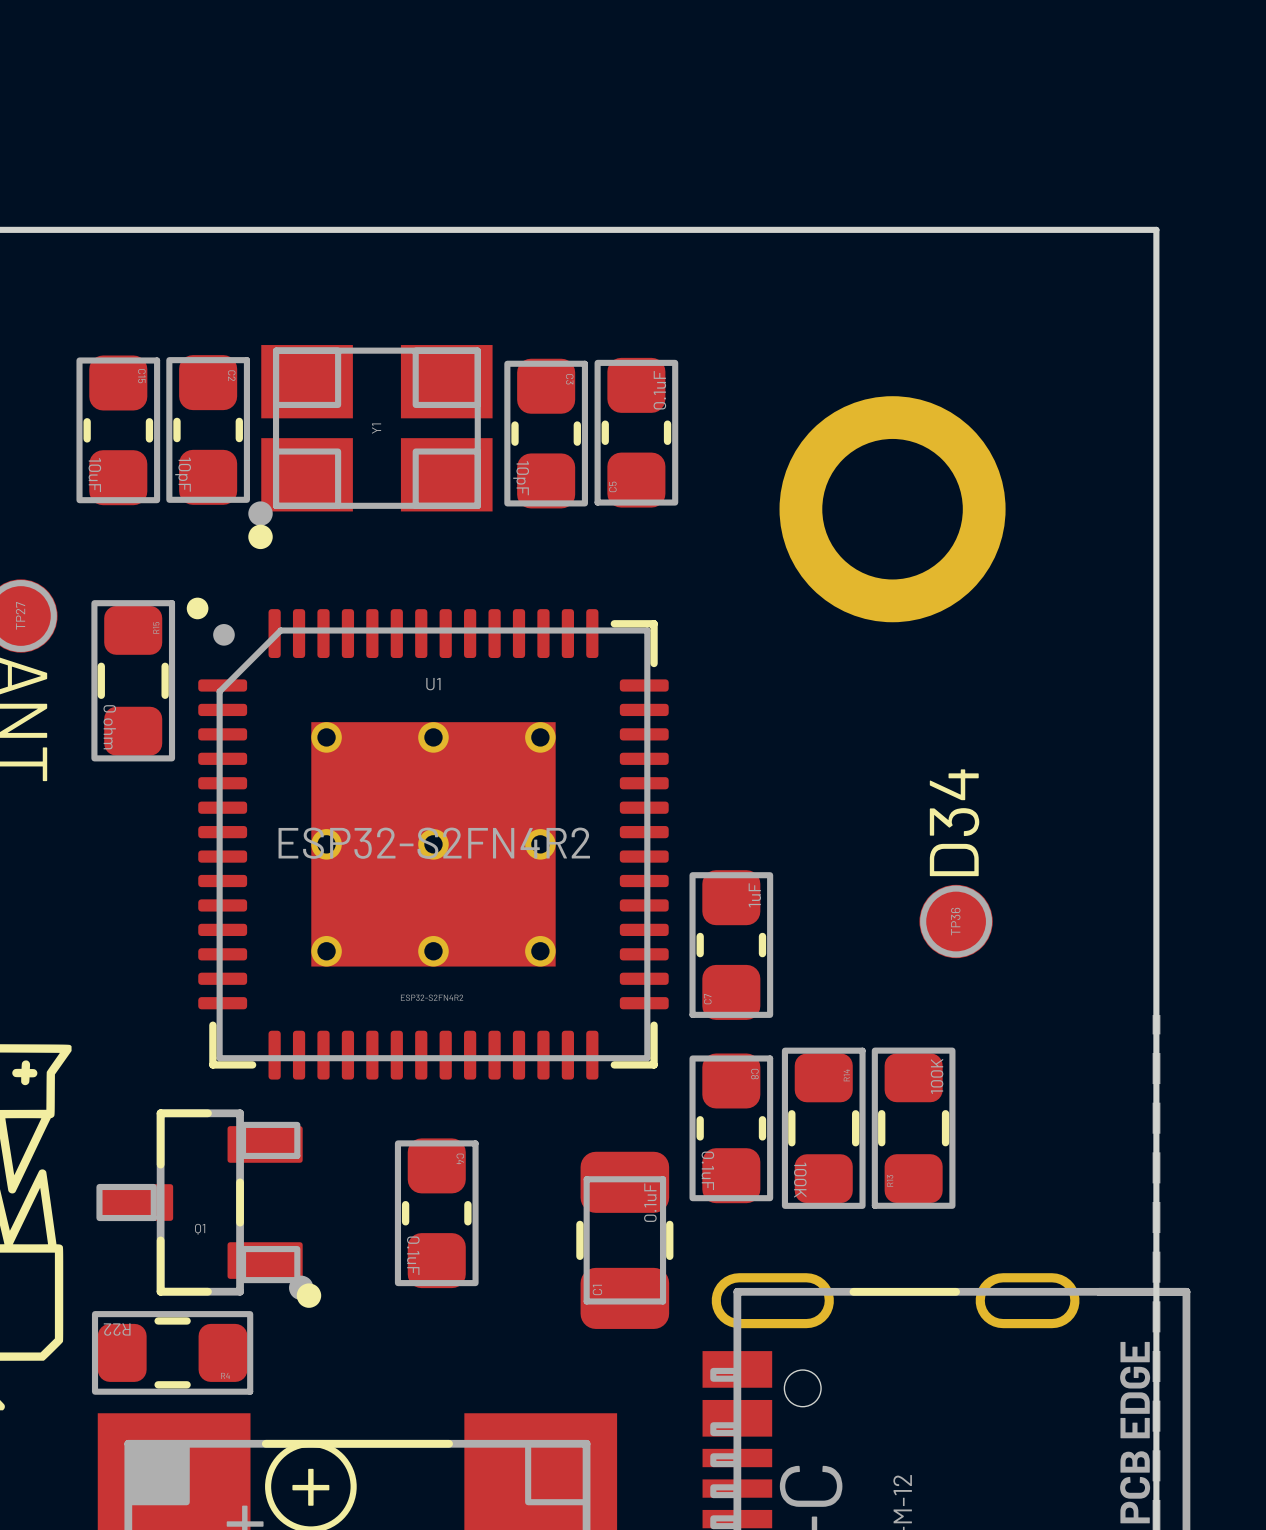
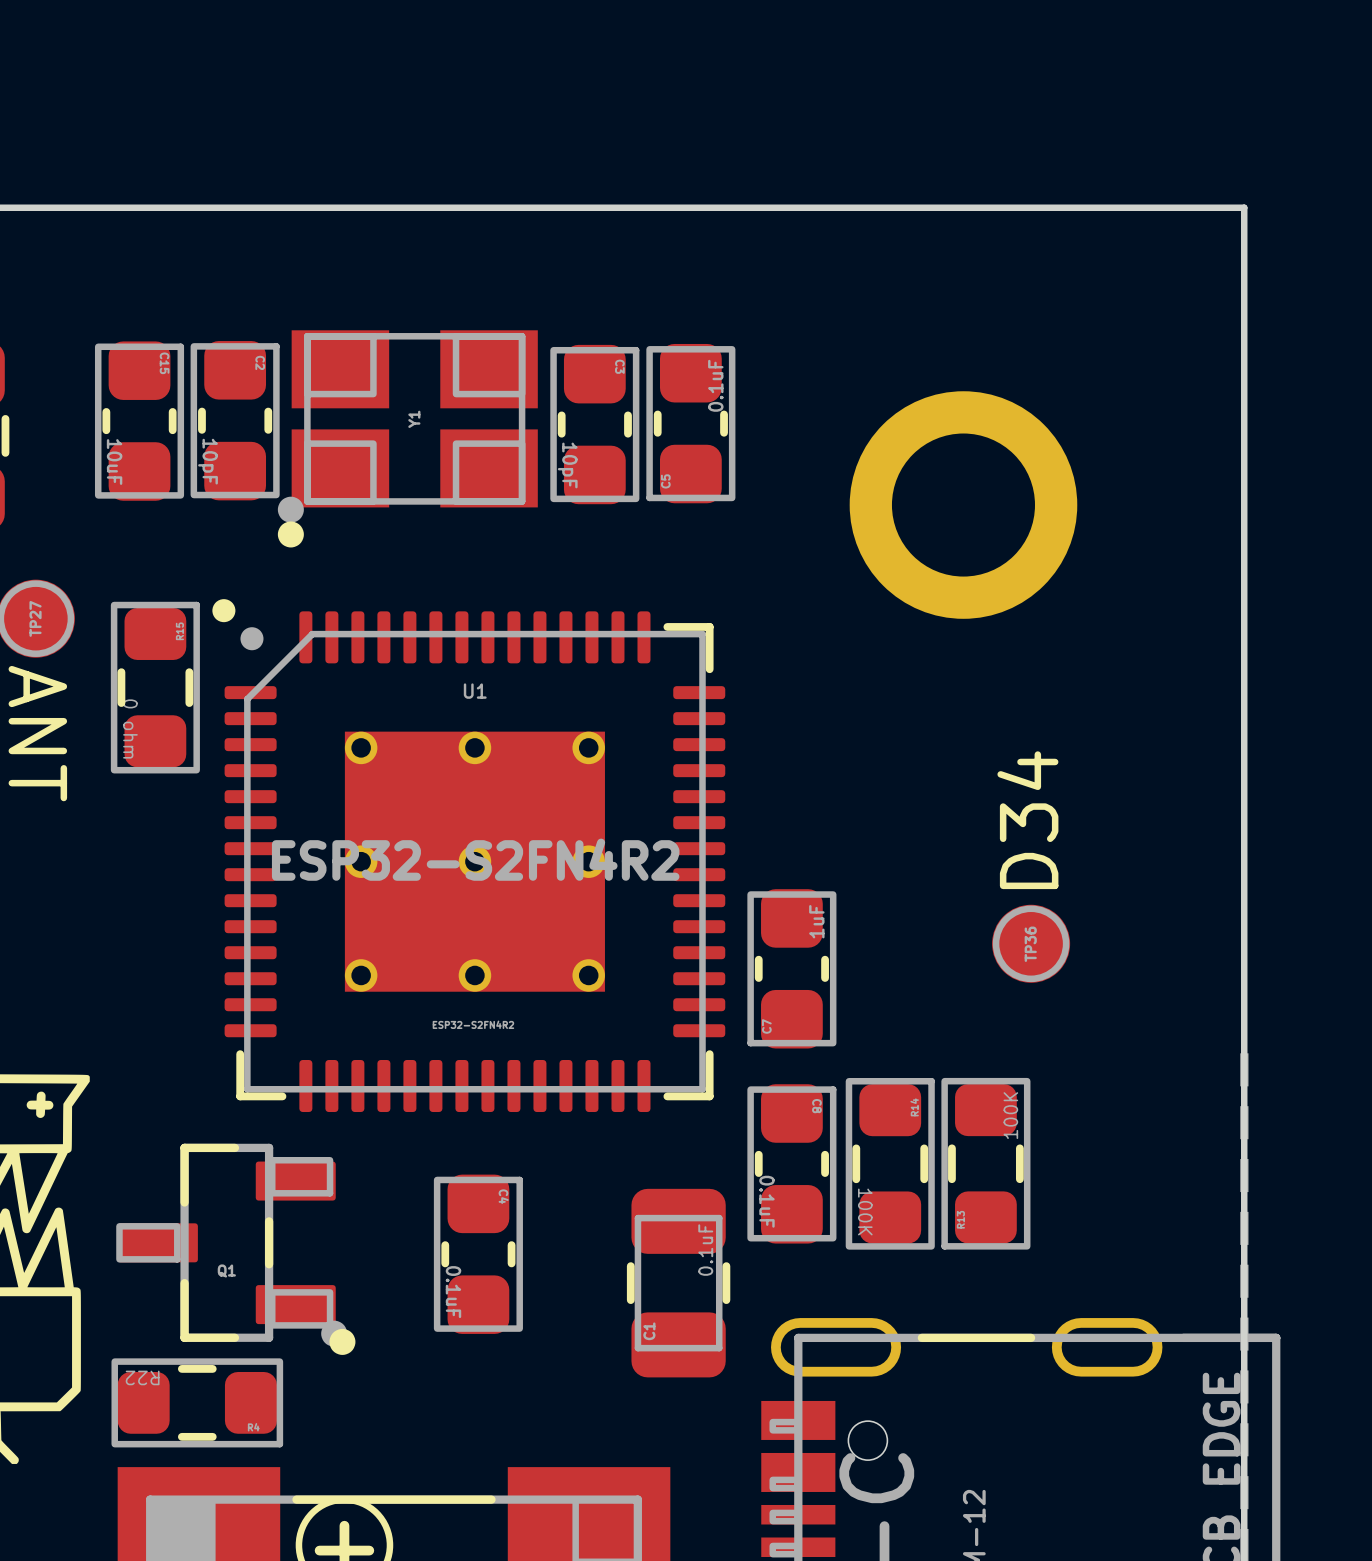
part footprint: [779, 396, 1006, 623] -> [849, 391, 1078, 619]

